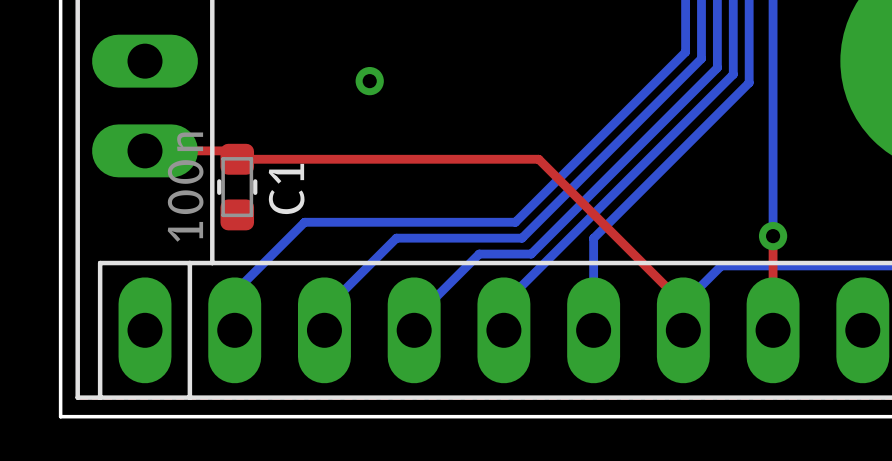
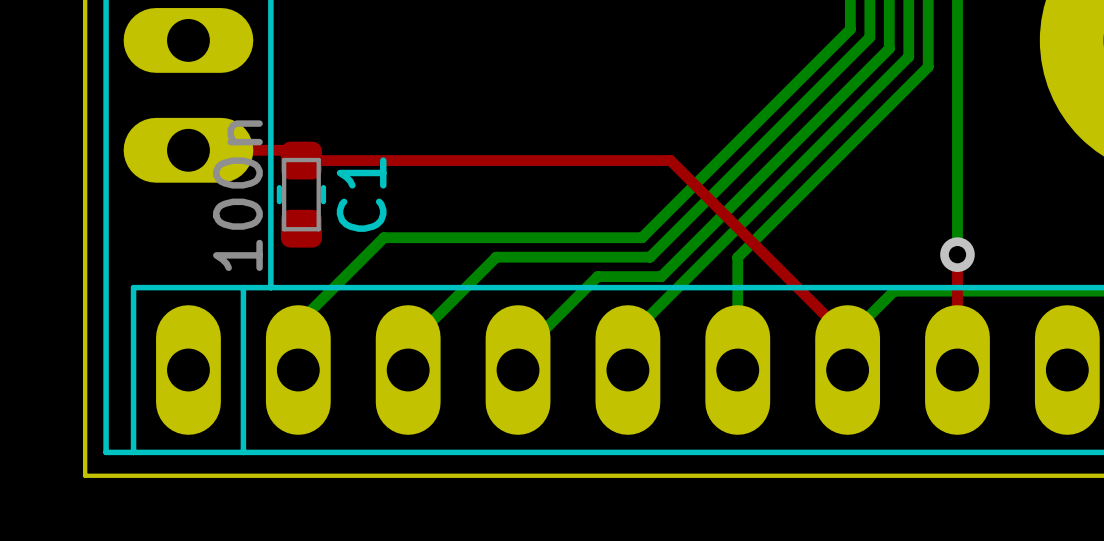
via: (369, 81) -> none

